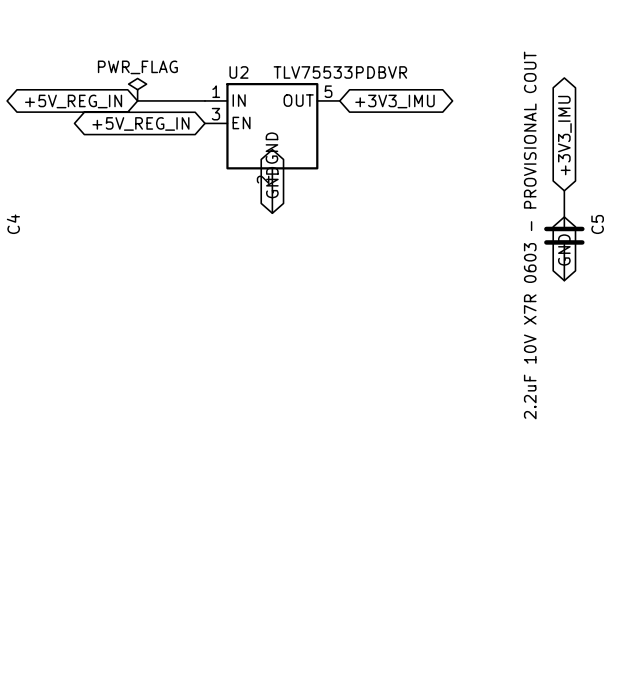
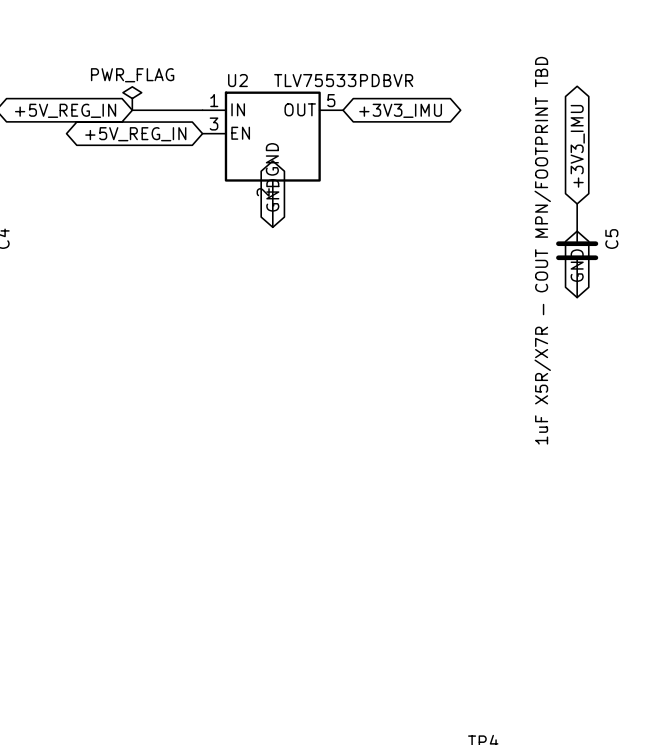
C5 value: 2.2uF 10V X7R 0603 - PROVISIONAL COUT (530, 235) -> 1uF X5R/X7R — COUT MPN/FOOTPRINT TBD (542, 250)

